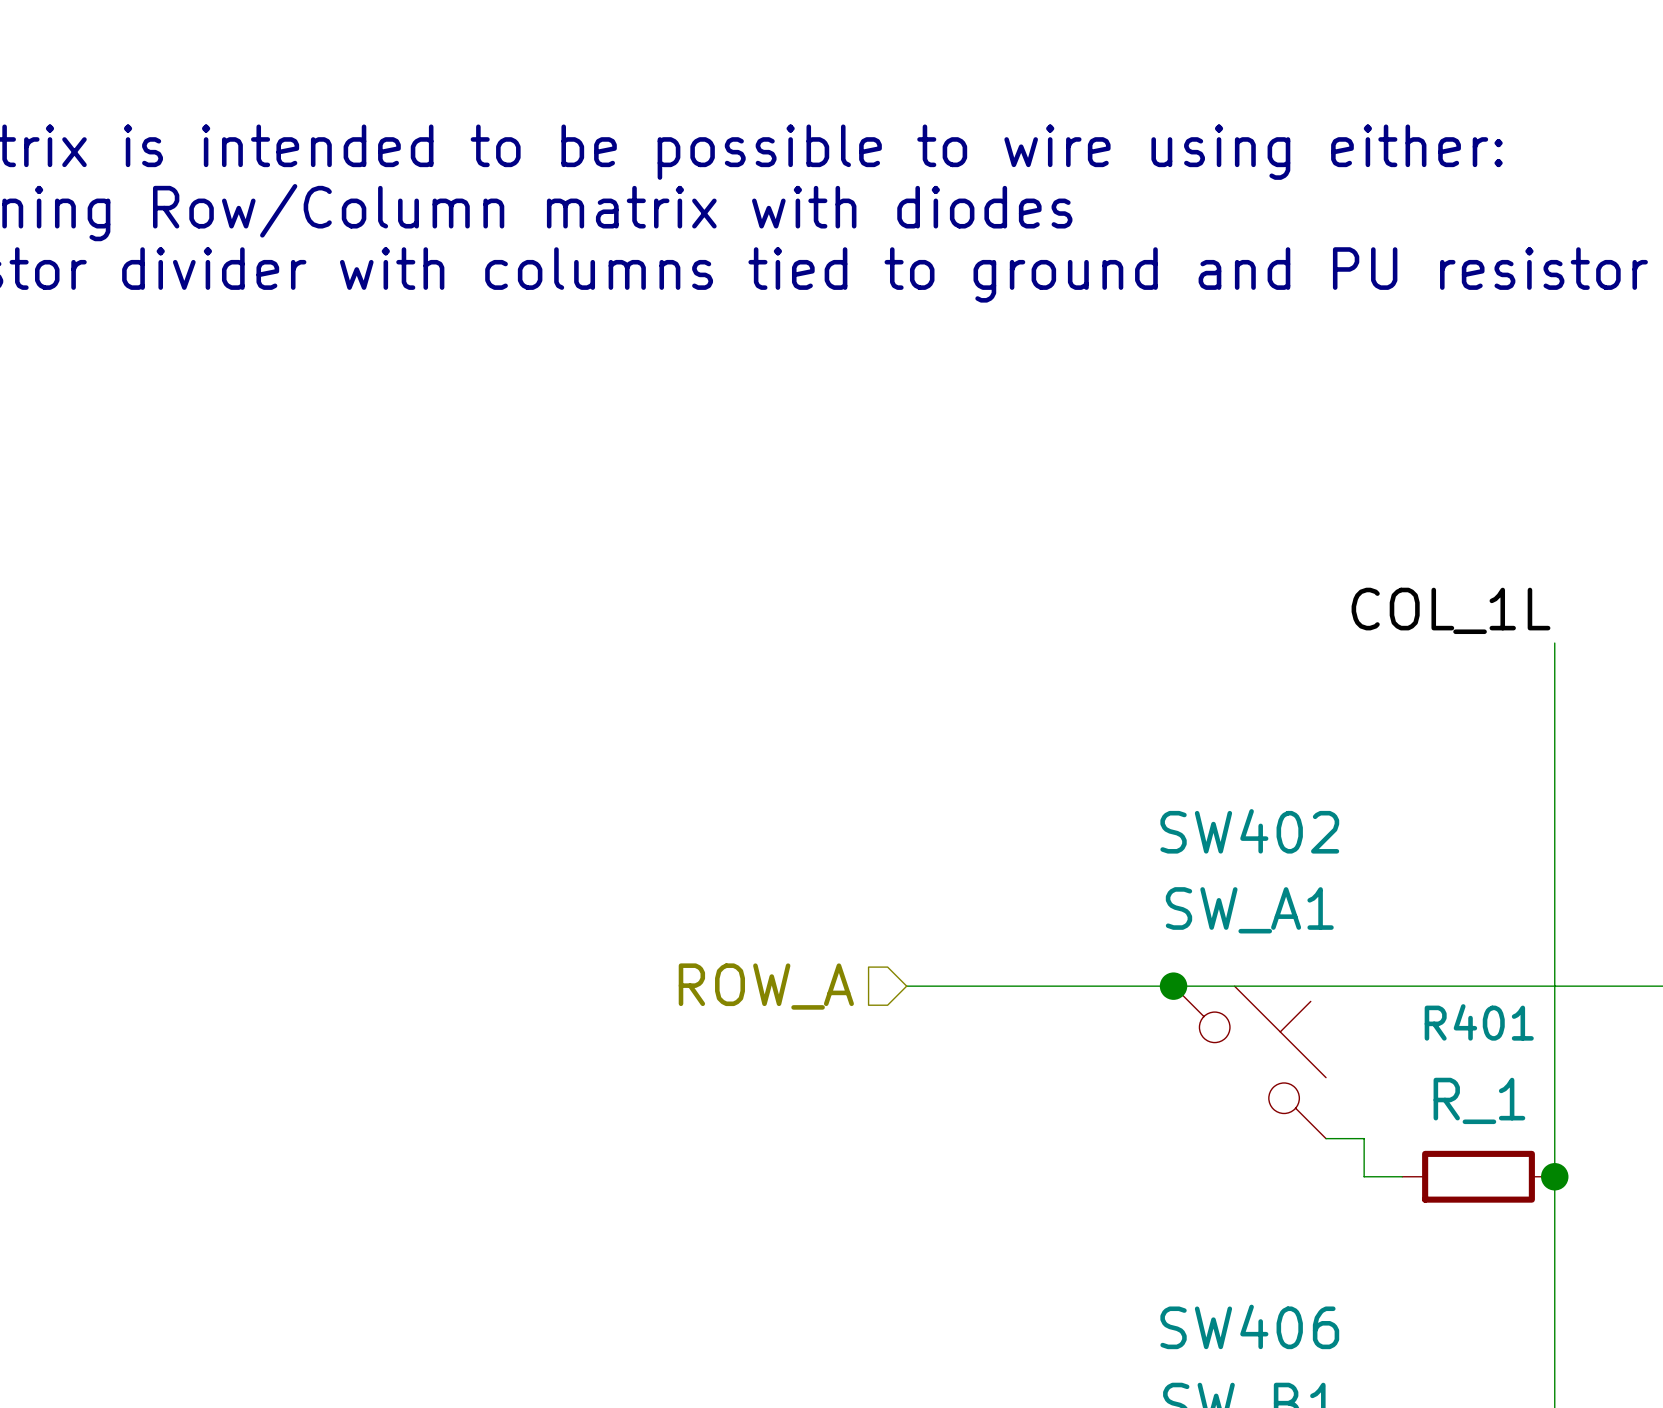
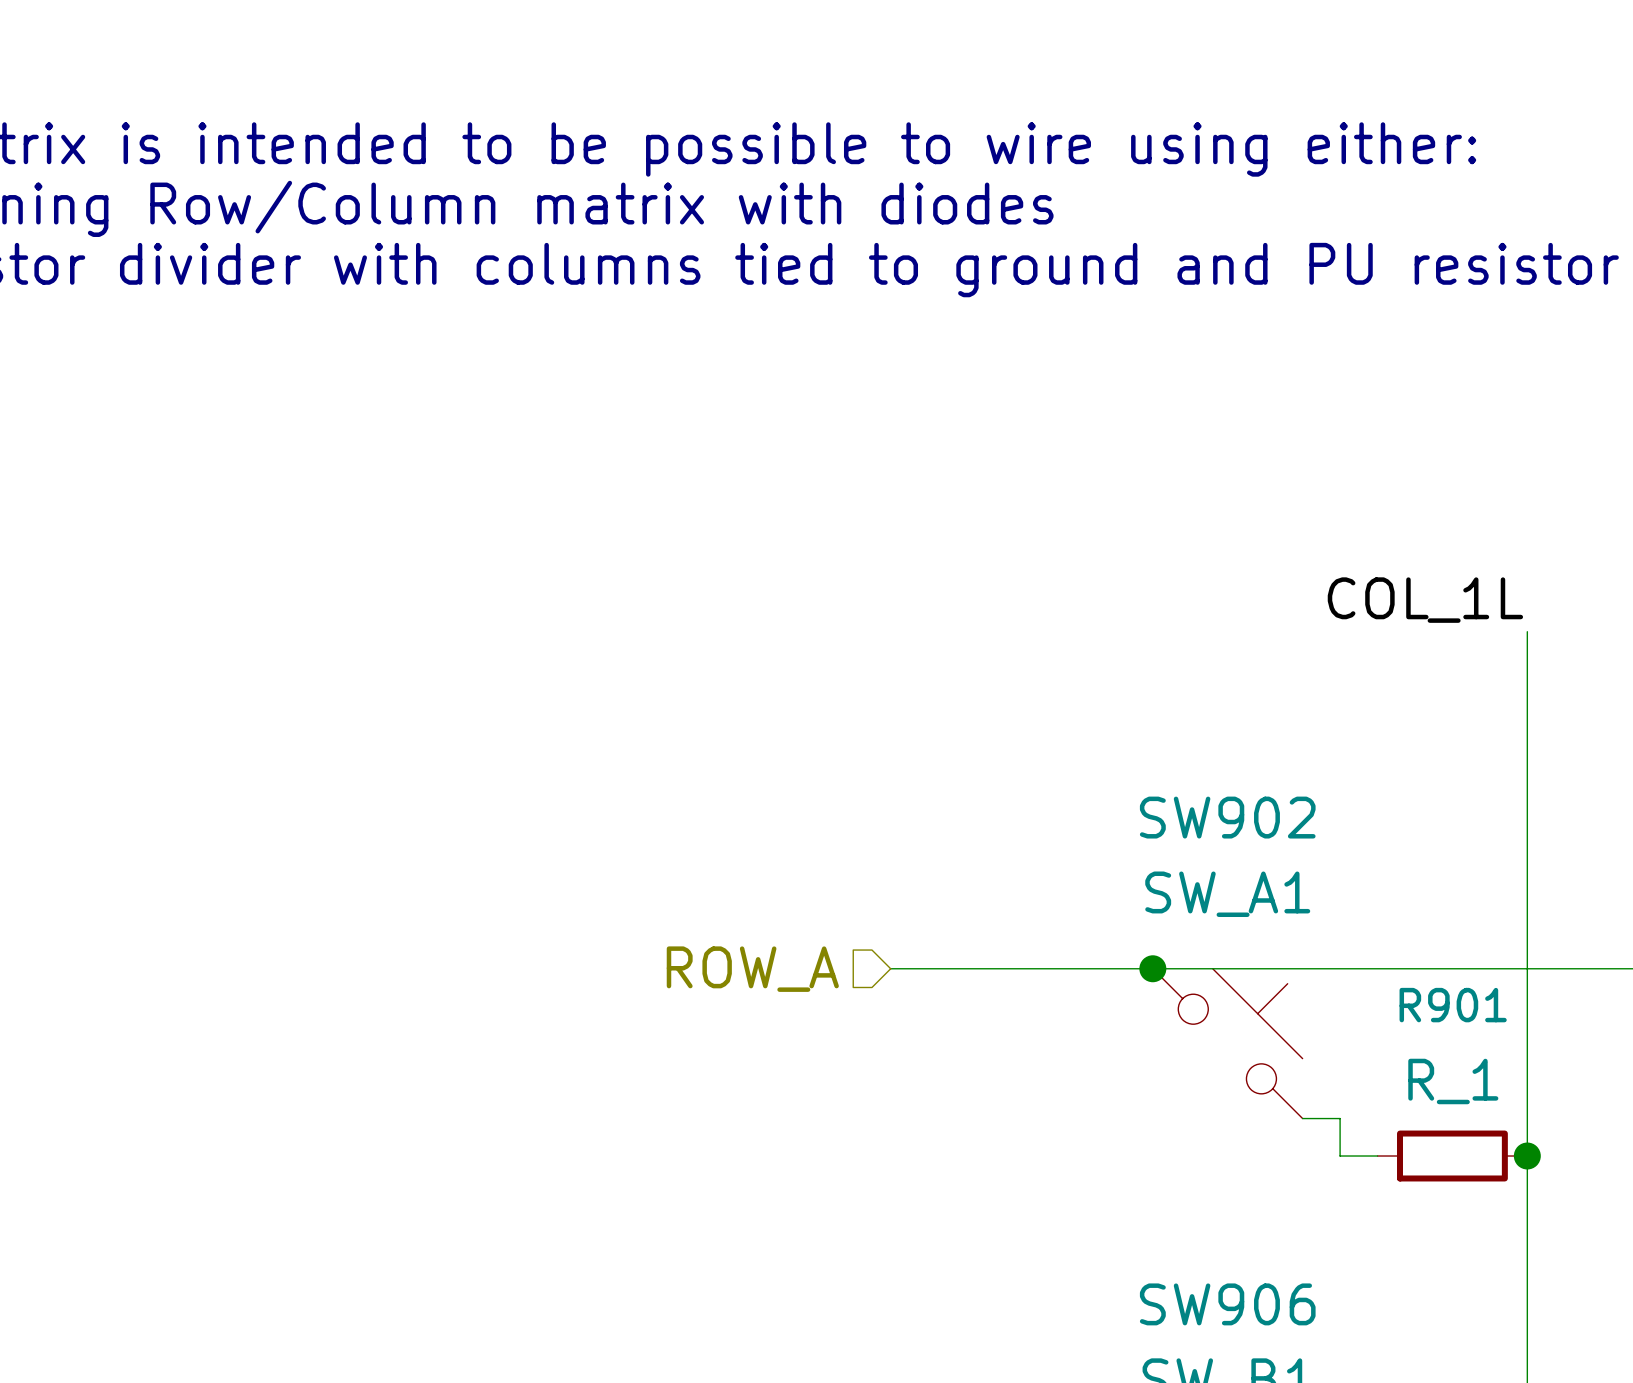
SW402 name: SW402 (1249, 831) -> SW902 (1227, 817)
R401 name: R401 (1479, 1022) -> R901 (1453, 1005)
SW406 name: SW406 (1249, 1326) -> SW906 (1227, 1304)

